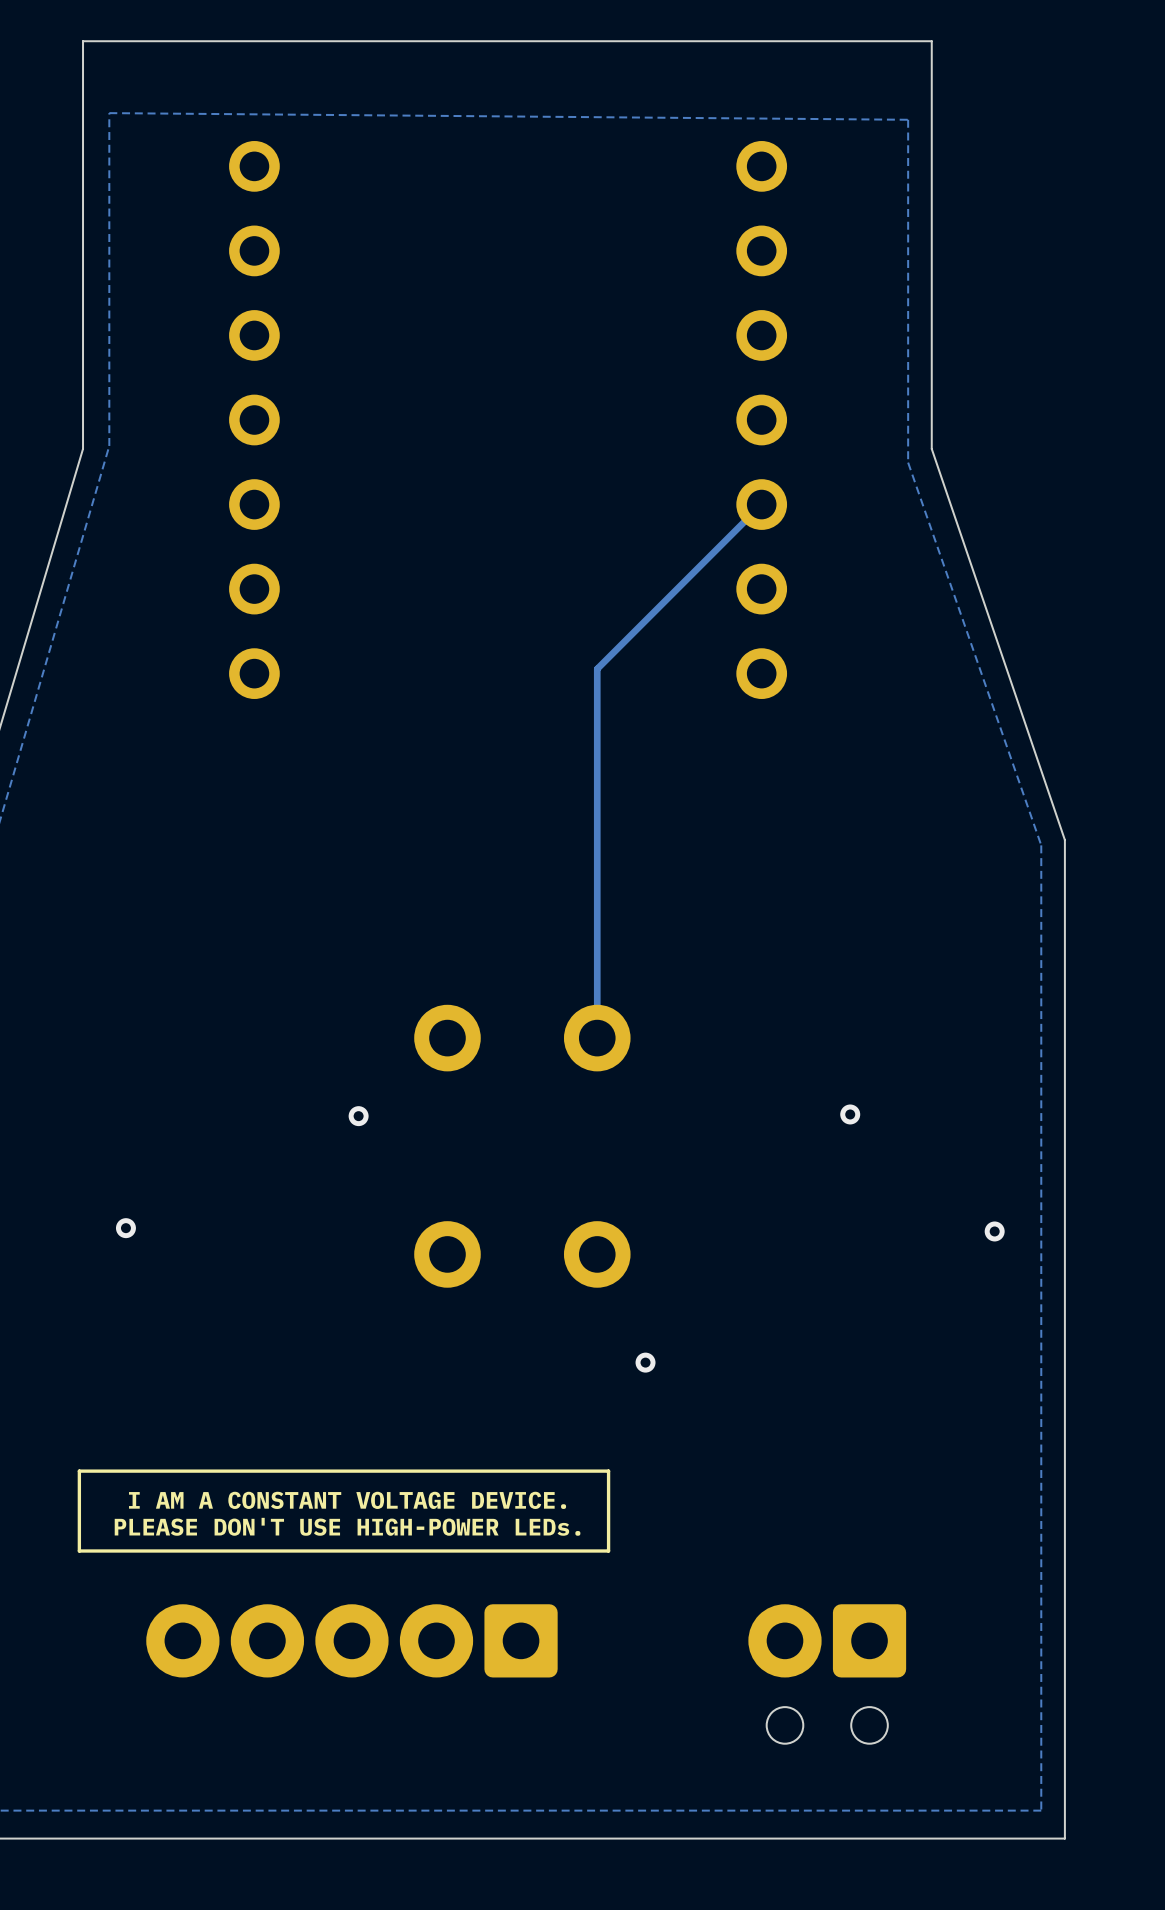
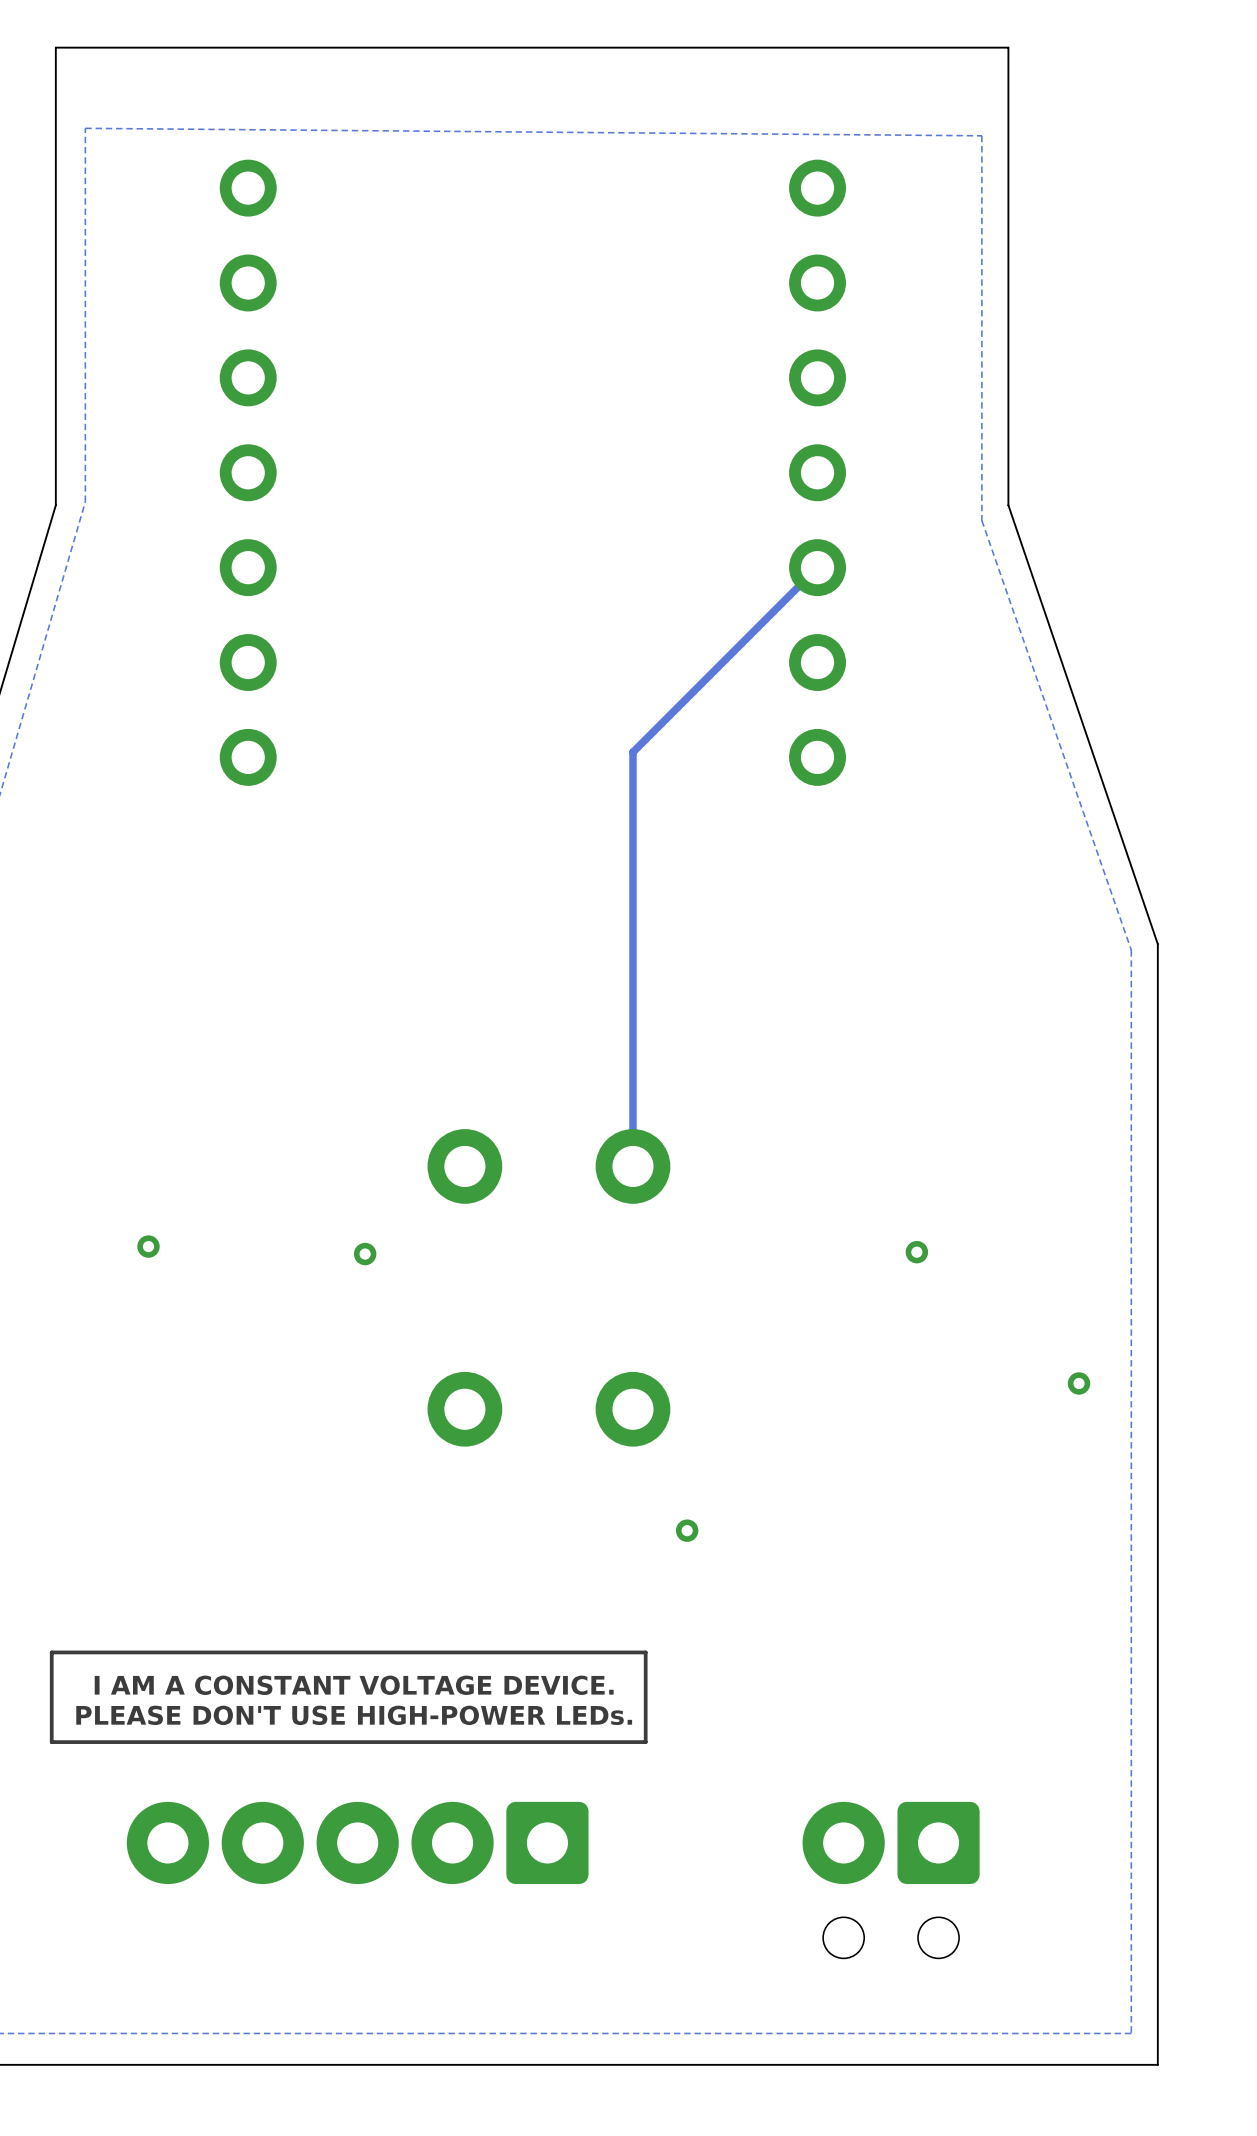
via position: (125, 1228) -> (148, 1246)

